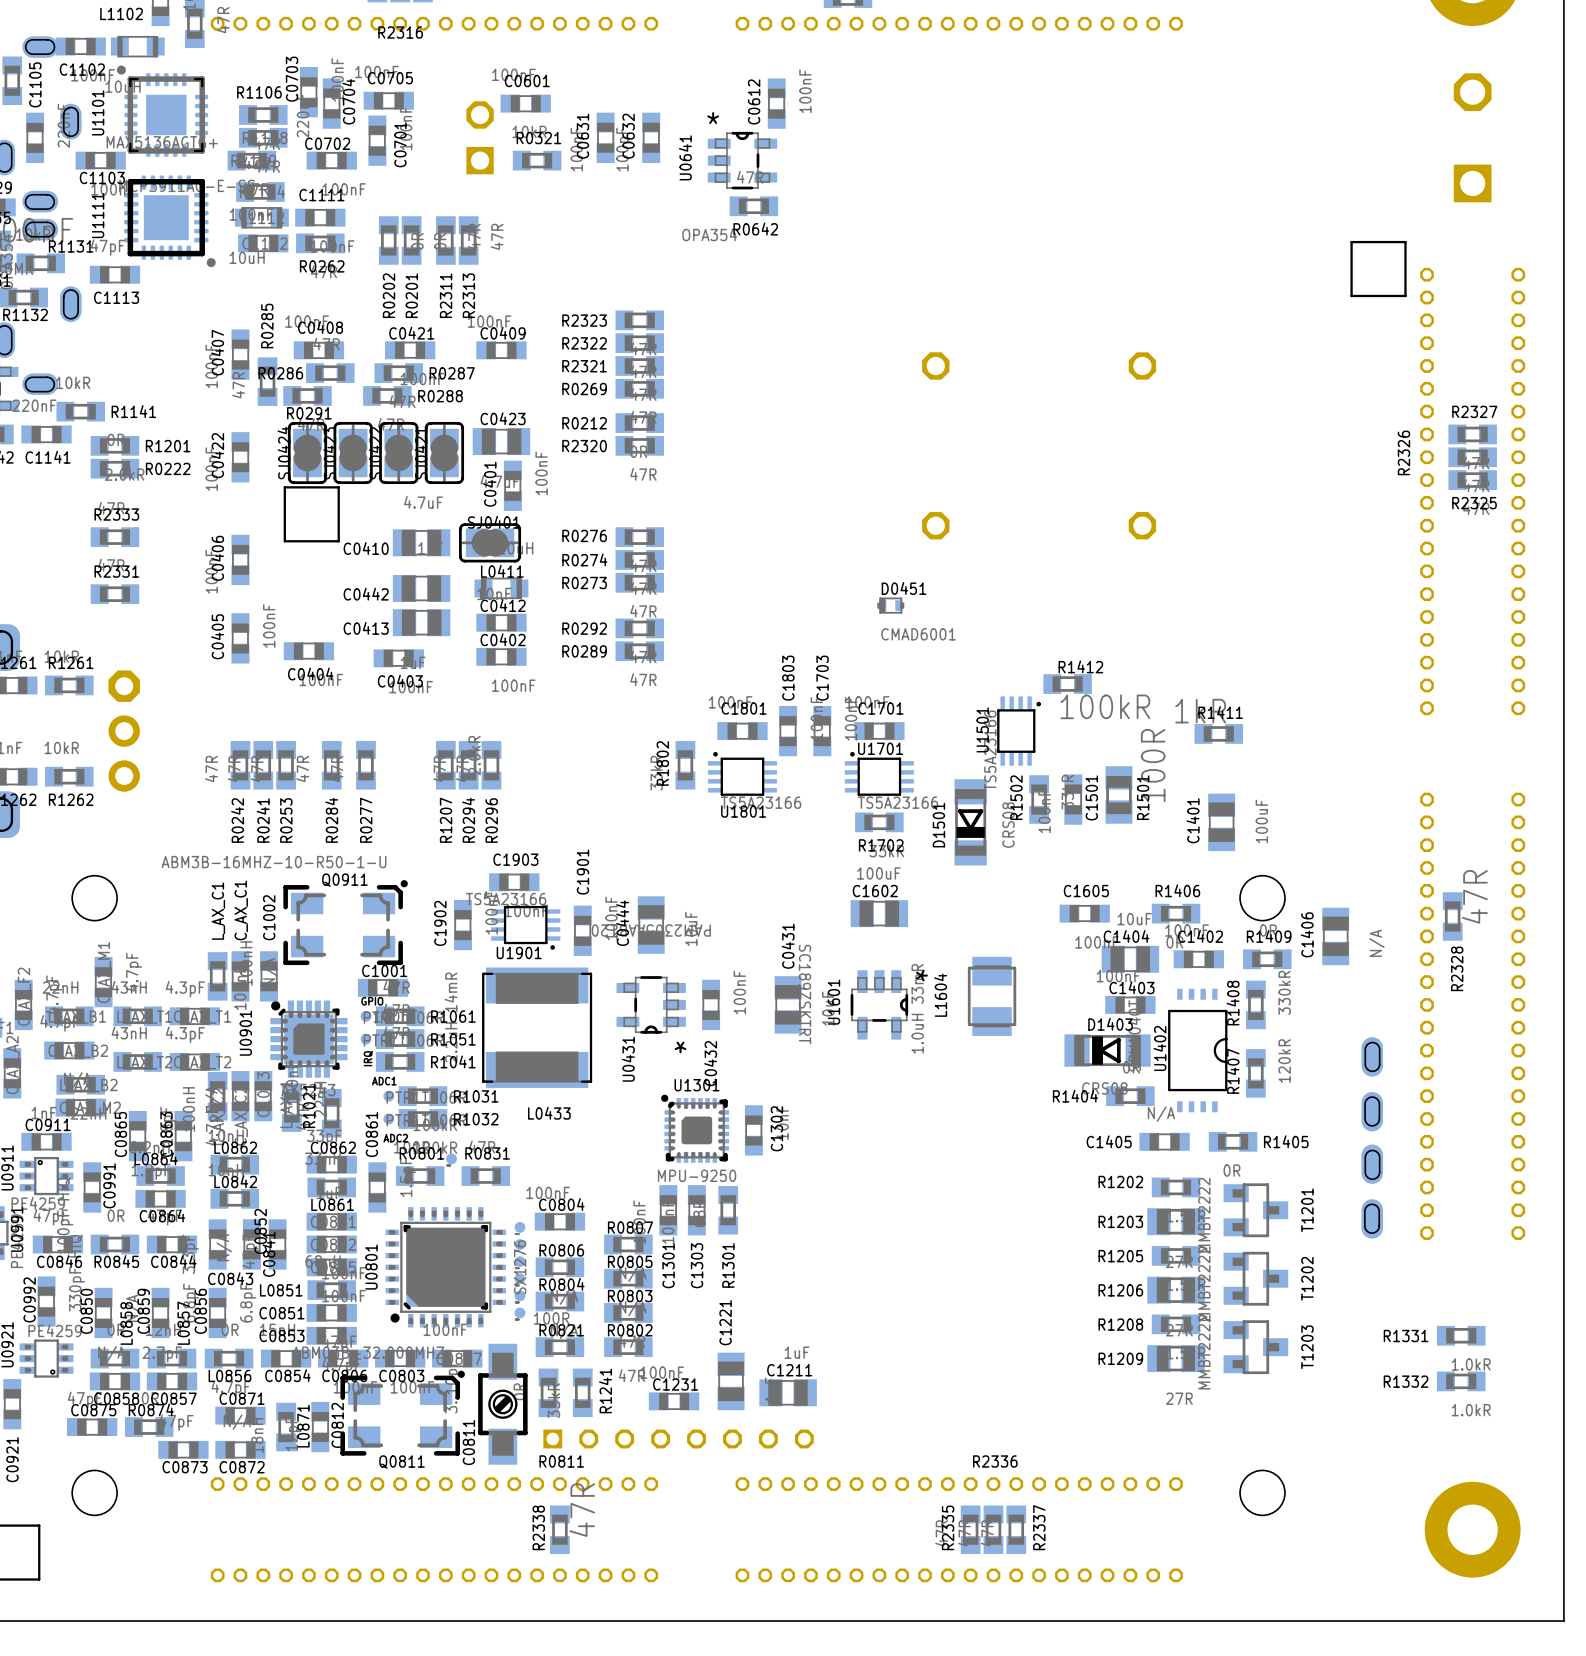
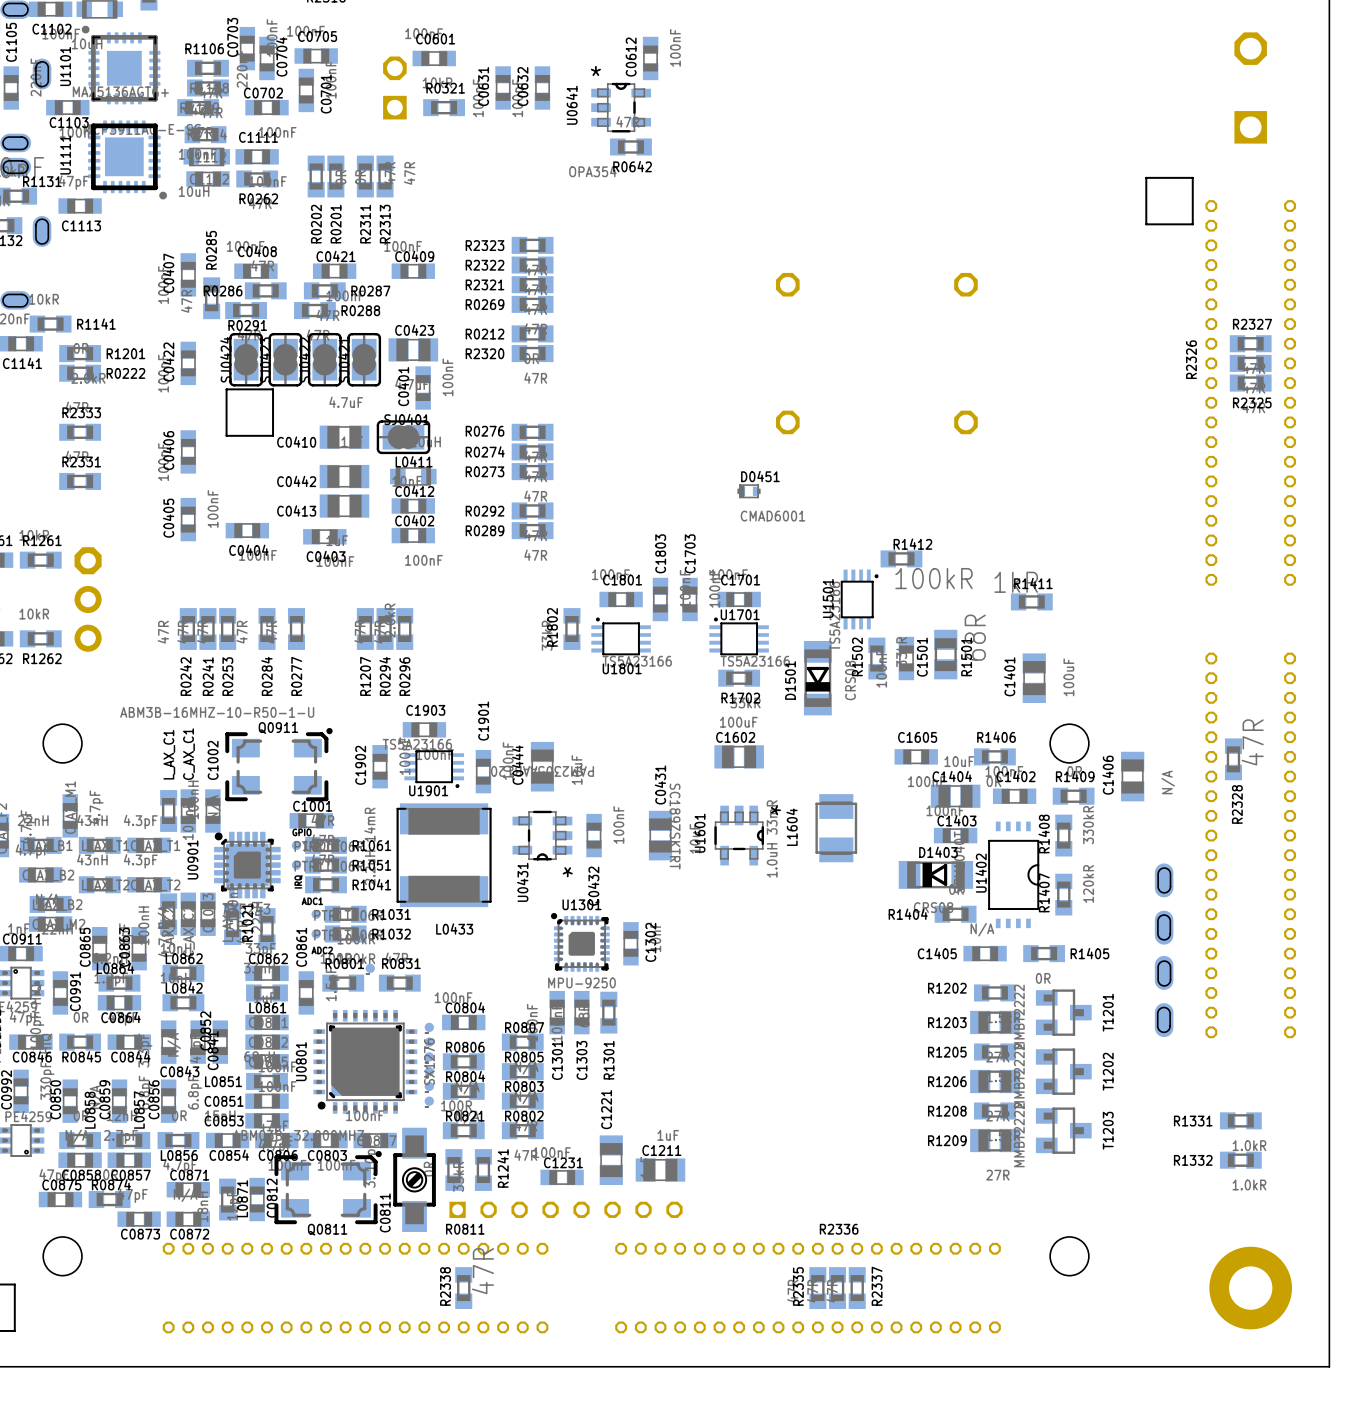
R1501 value: 100R (1153, 765) -> 68R (975, 637)

